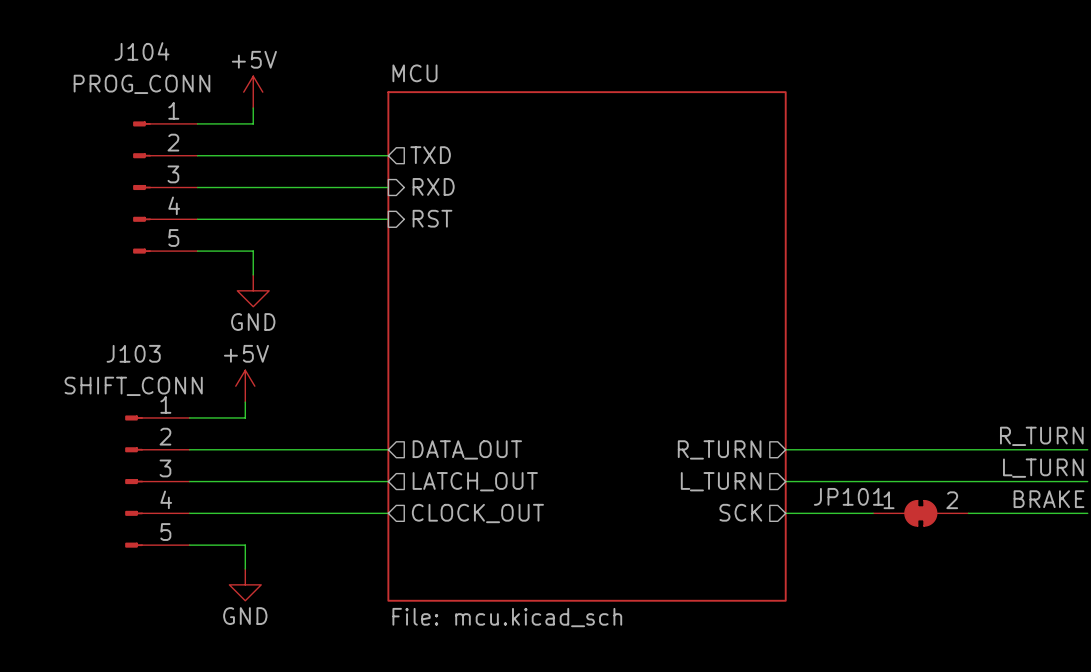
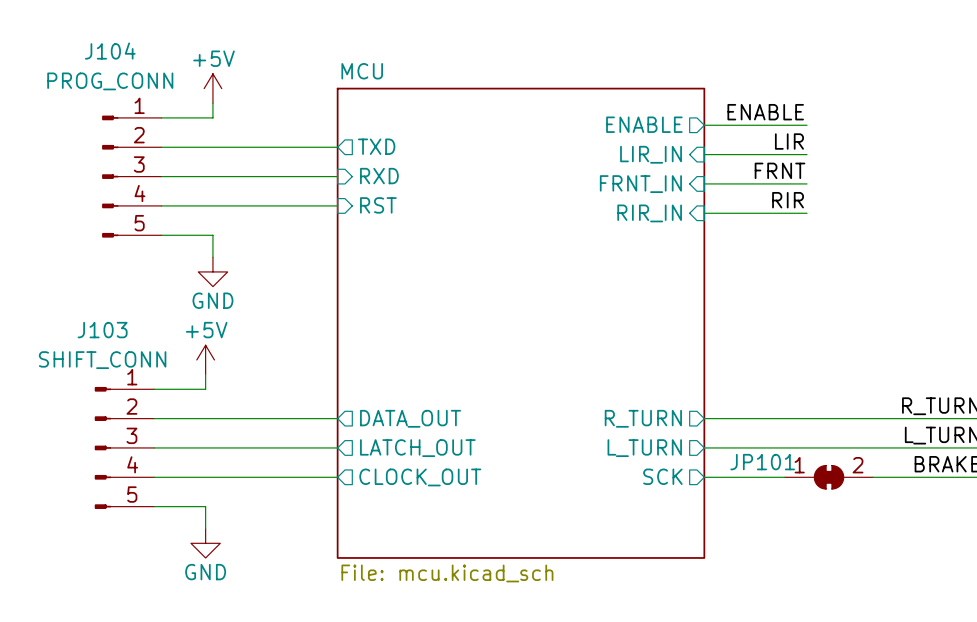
label: none -> ENABLE (765, 112)
sheet pin: none -> ENABLE (644, 124)
wire: none -> (704, 125) (807, 125)
label: none -> LIR (789, 141)
sheet pin: none -> LIR_IN (651, 154)
wire: none -> (704, 154) (807, 154)
label: none -> FRNT (780, 170)
sheet pin: none -> FRNT_IN (640, 184)
wire: none -> (704, 183) (807, 183)
label: none -> RIR (788, 200)
sheet pin: none -> RIR_IN (649, 213)
wire: none -> (704, 213) (807, 213)

